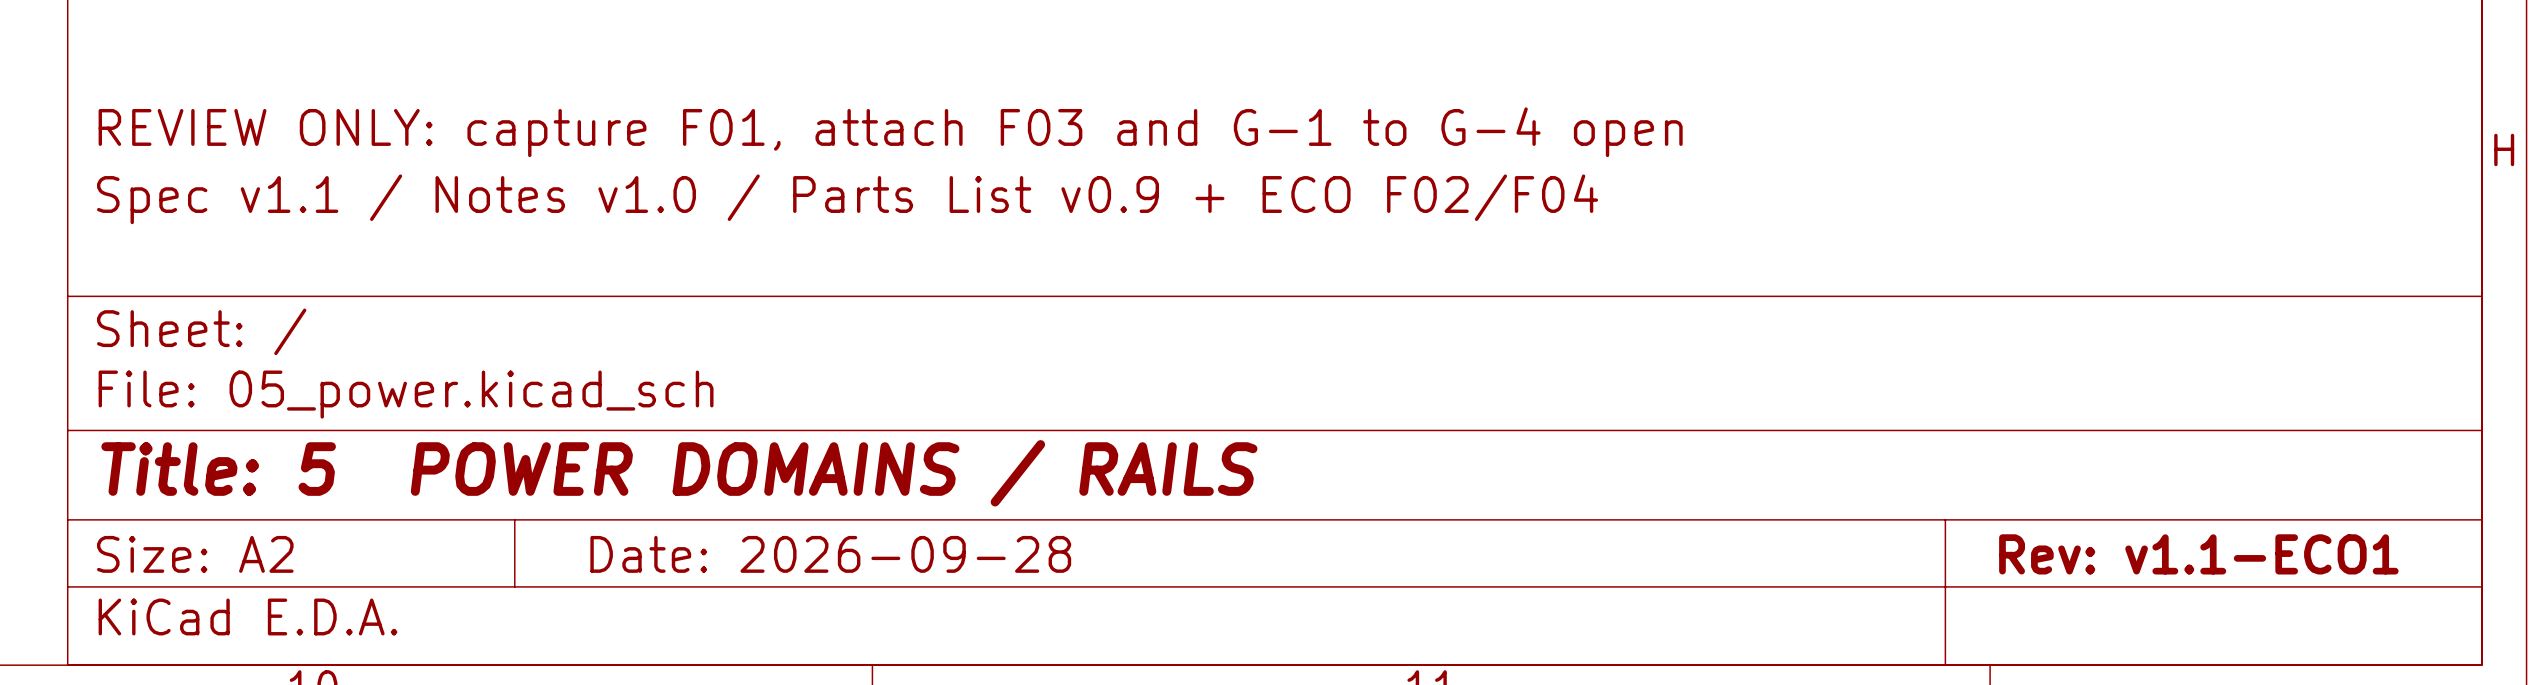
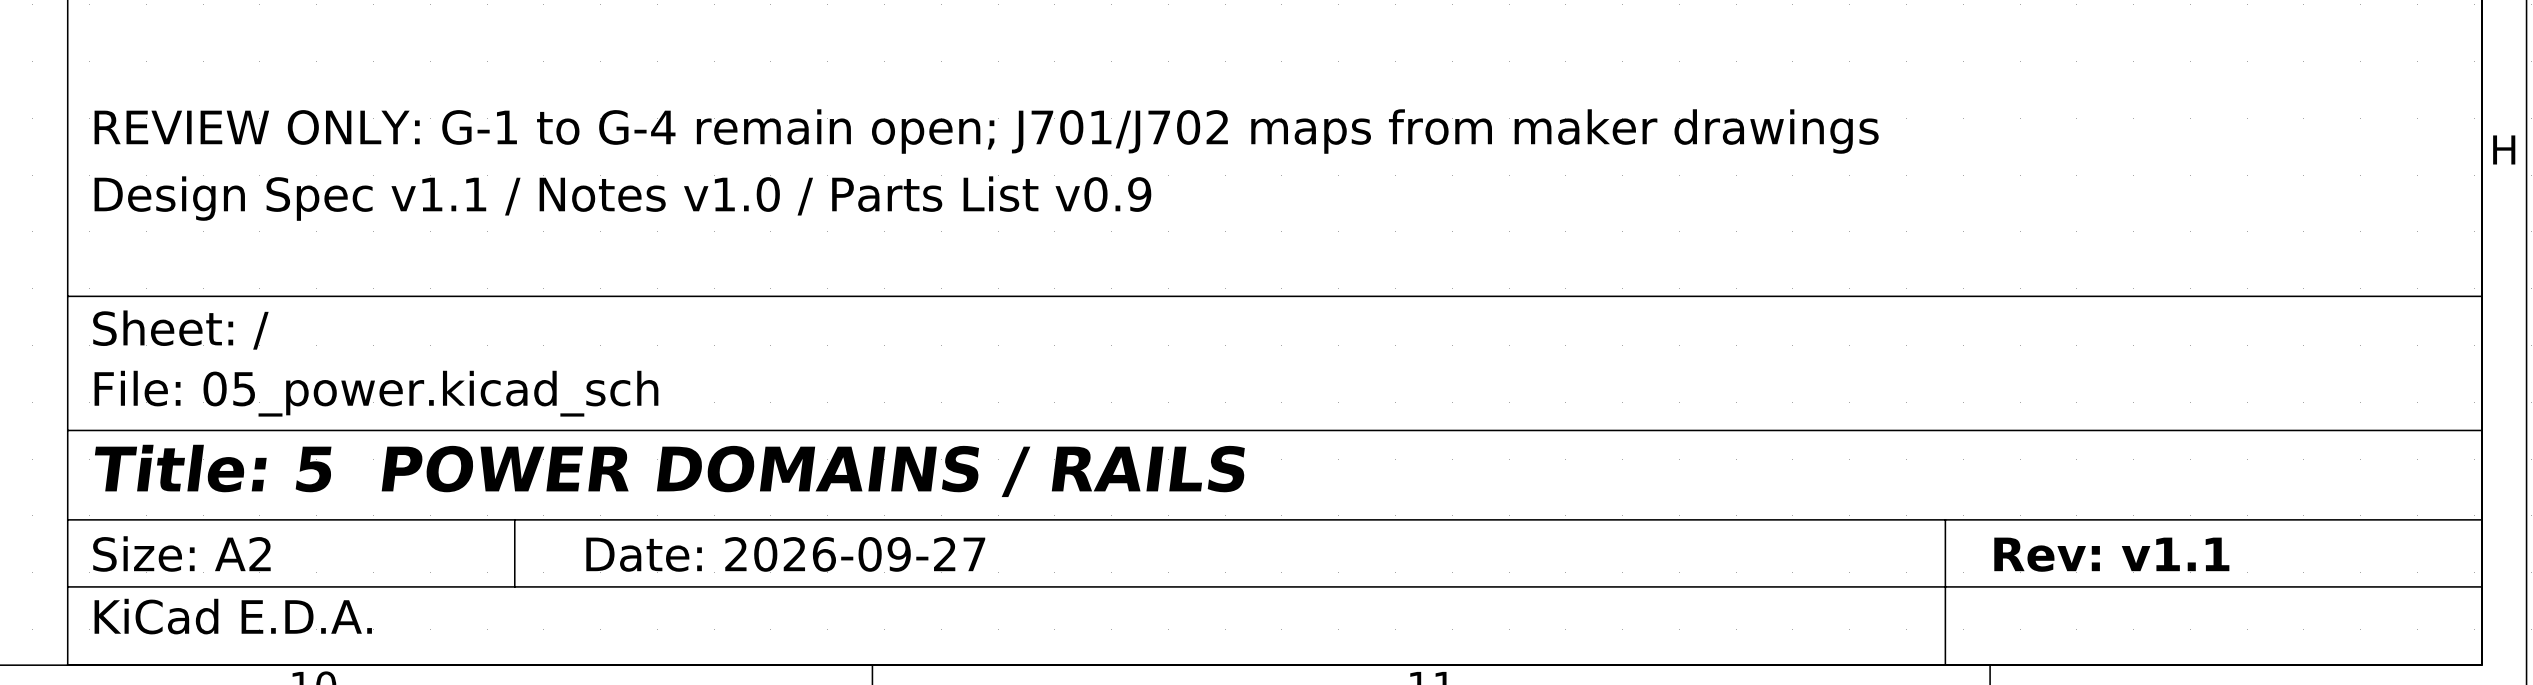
title block: REVIEW ONLY: capture F01, attach F03 and G-1 to G-4 open (890, 132) -> REVIEW ONLY: G-1 to G-4 remain open; J701/J702 maps from maker drawings (986, 131)
title block: Spec v1.1 / Notes v1.0 / Parts List v0.9 + ECO F02/F04 (847, 199) -> Design Spec v1.1 / Notes v1.0 / Parts List v0.9 (622, 198)
title block: Date: 2026-09-28 (830, 554) -> Date: 2026-09-27 (785, 554)
title block: Rev: v1.1-ECO1 (2198, 554) -> Rev: v1.1 (2111, 554)

